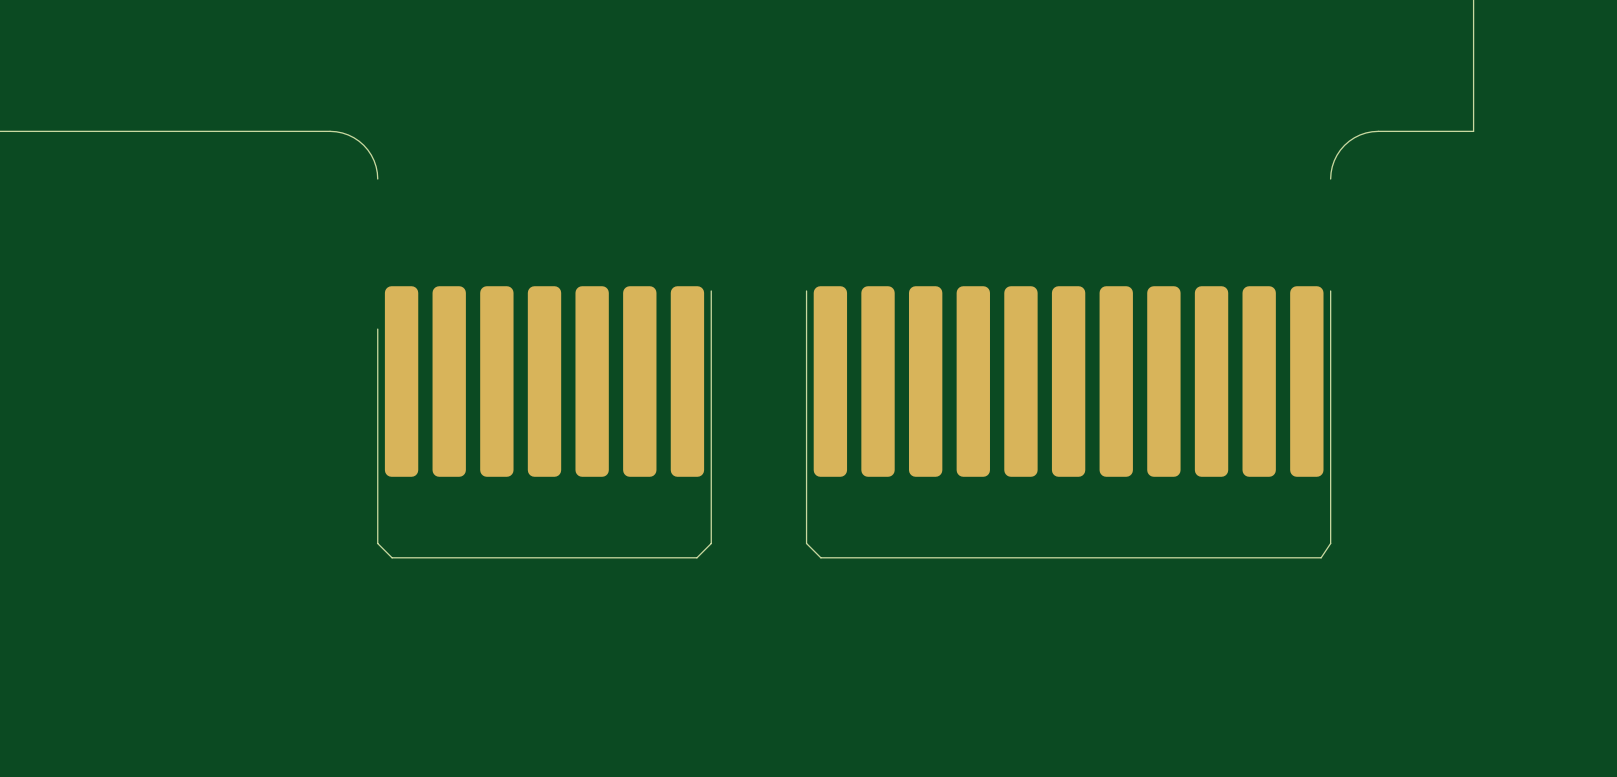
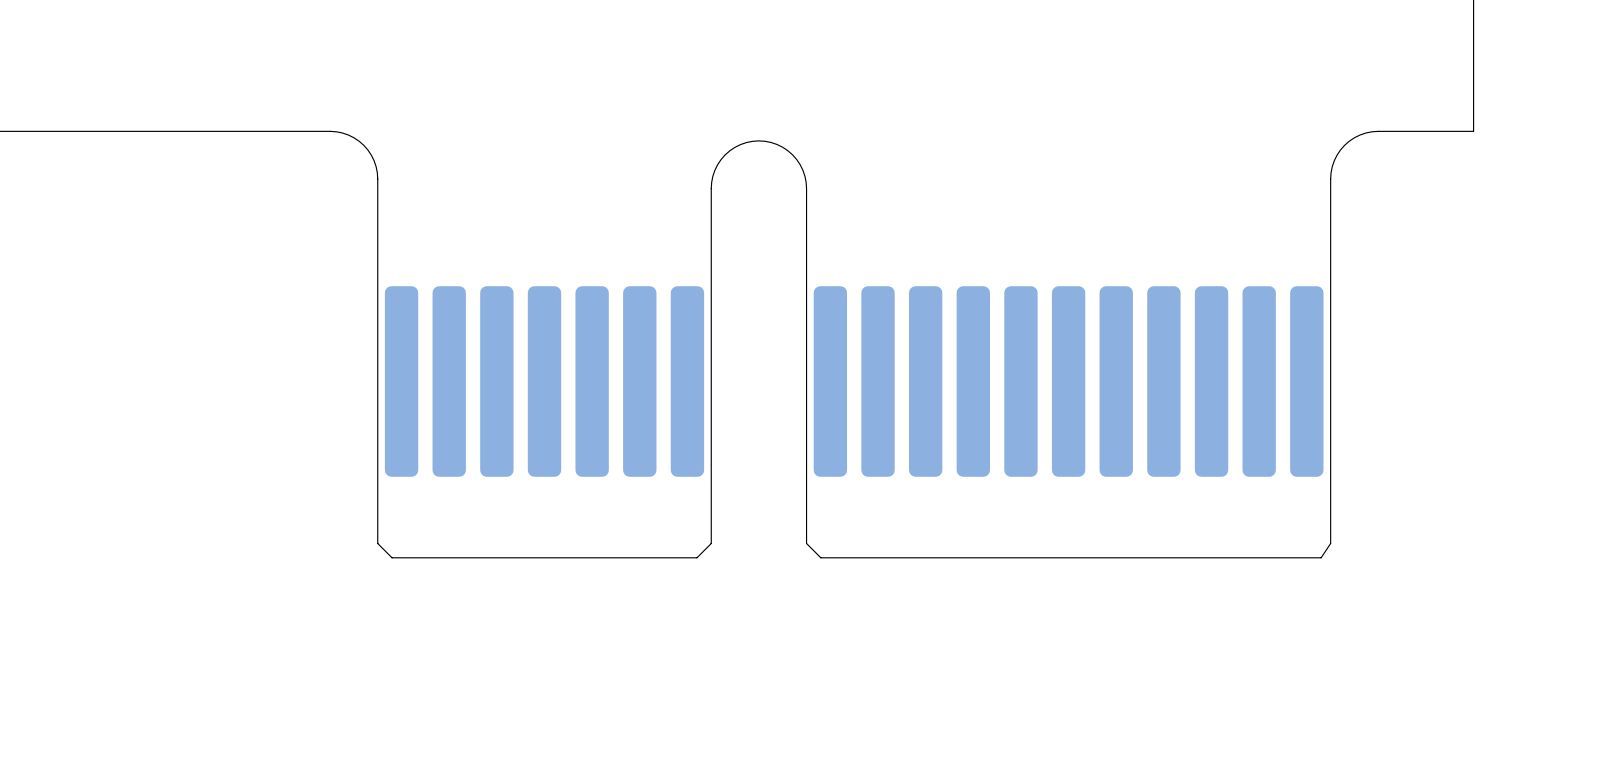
part: none -> (854, 349)
part: (854, 422) -> none

